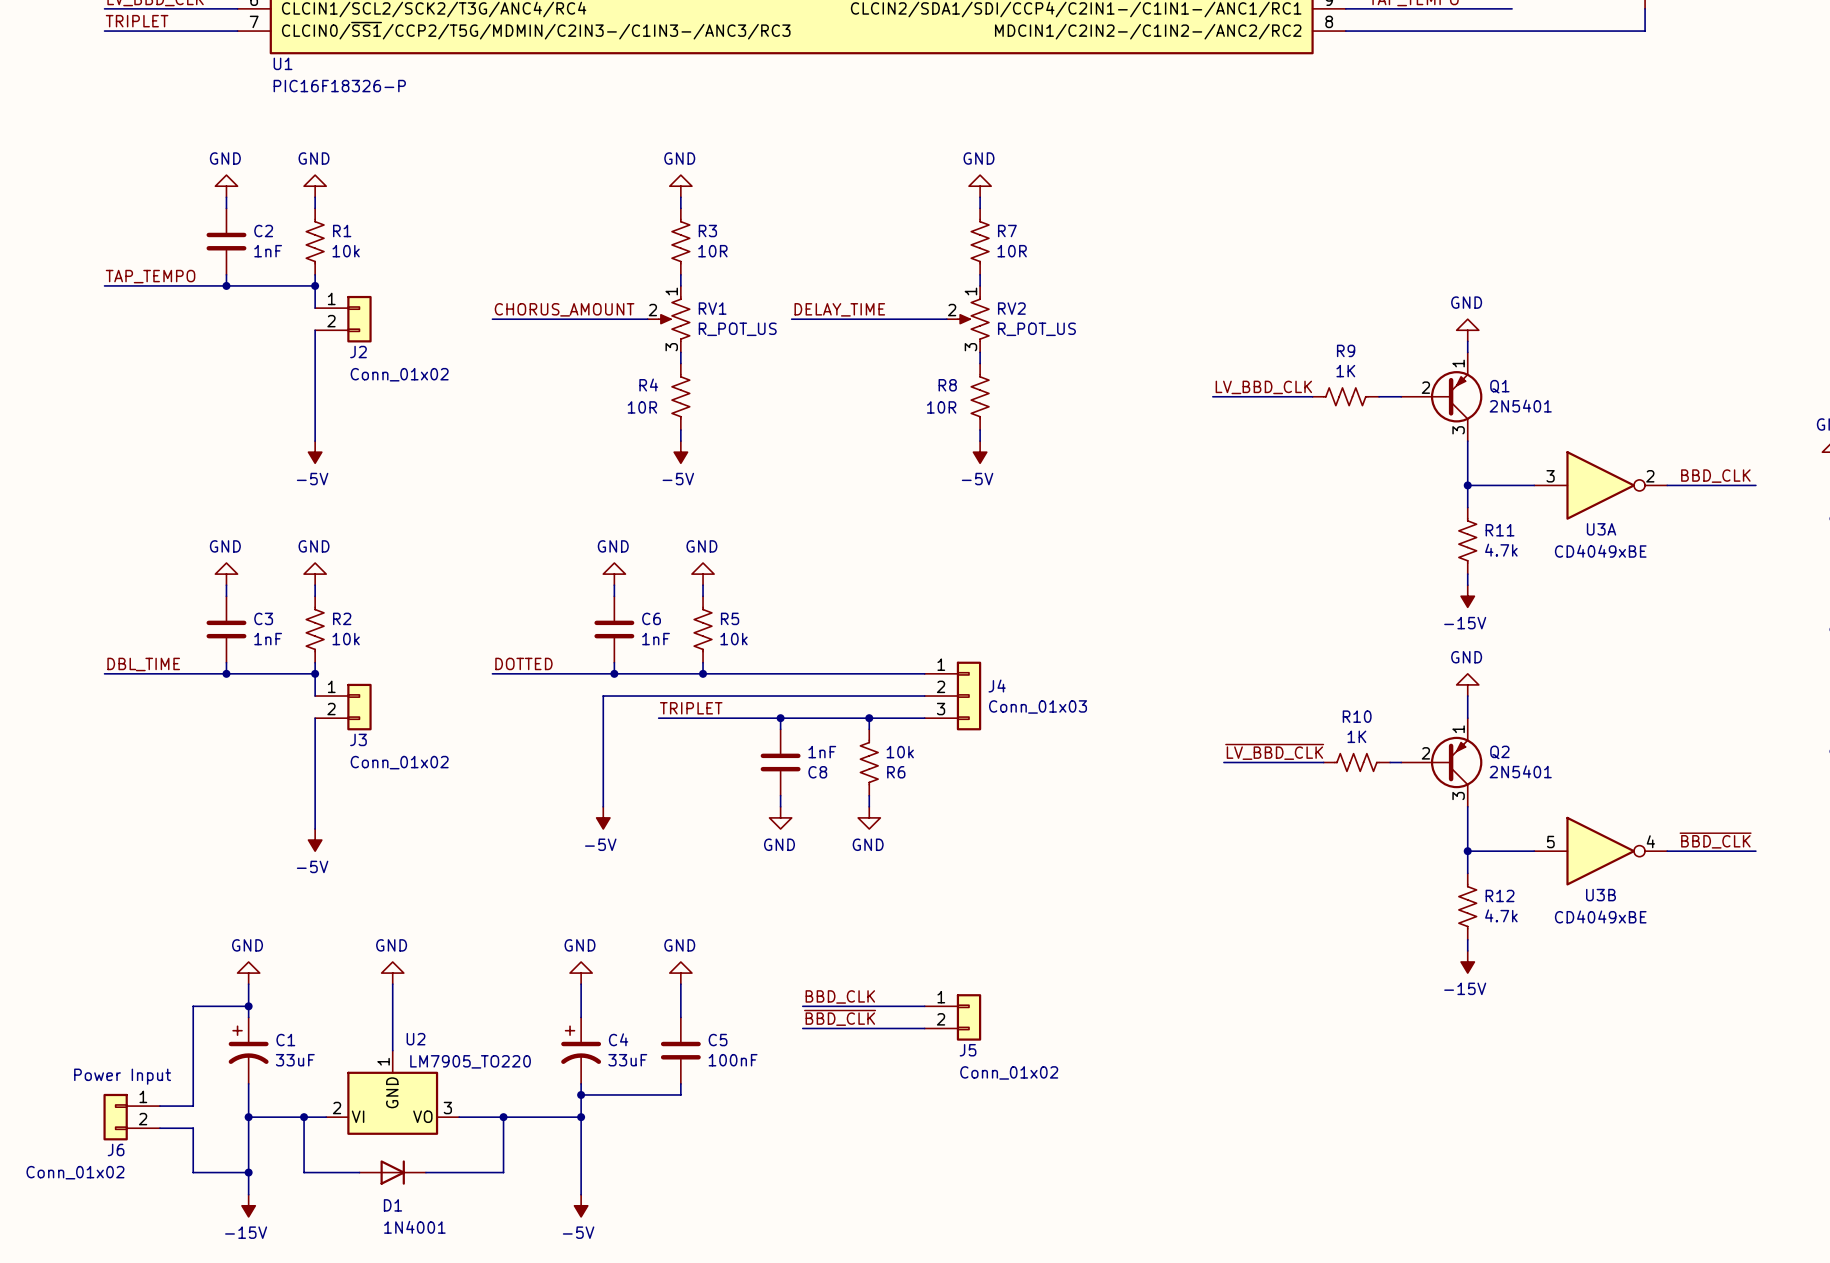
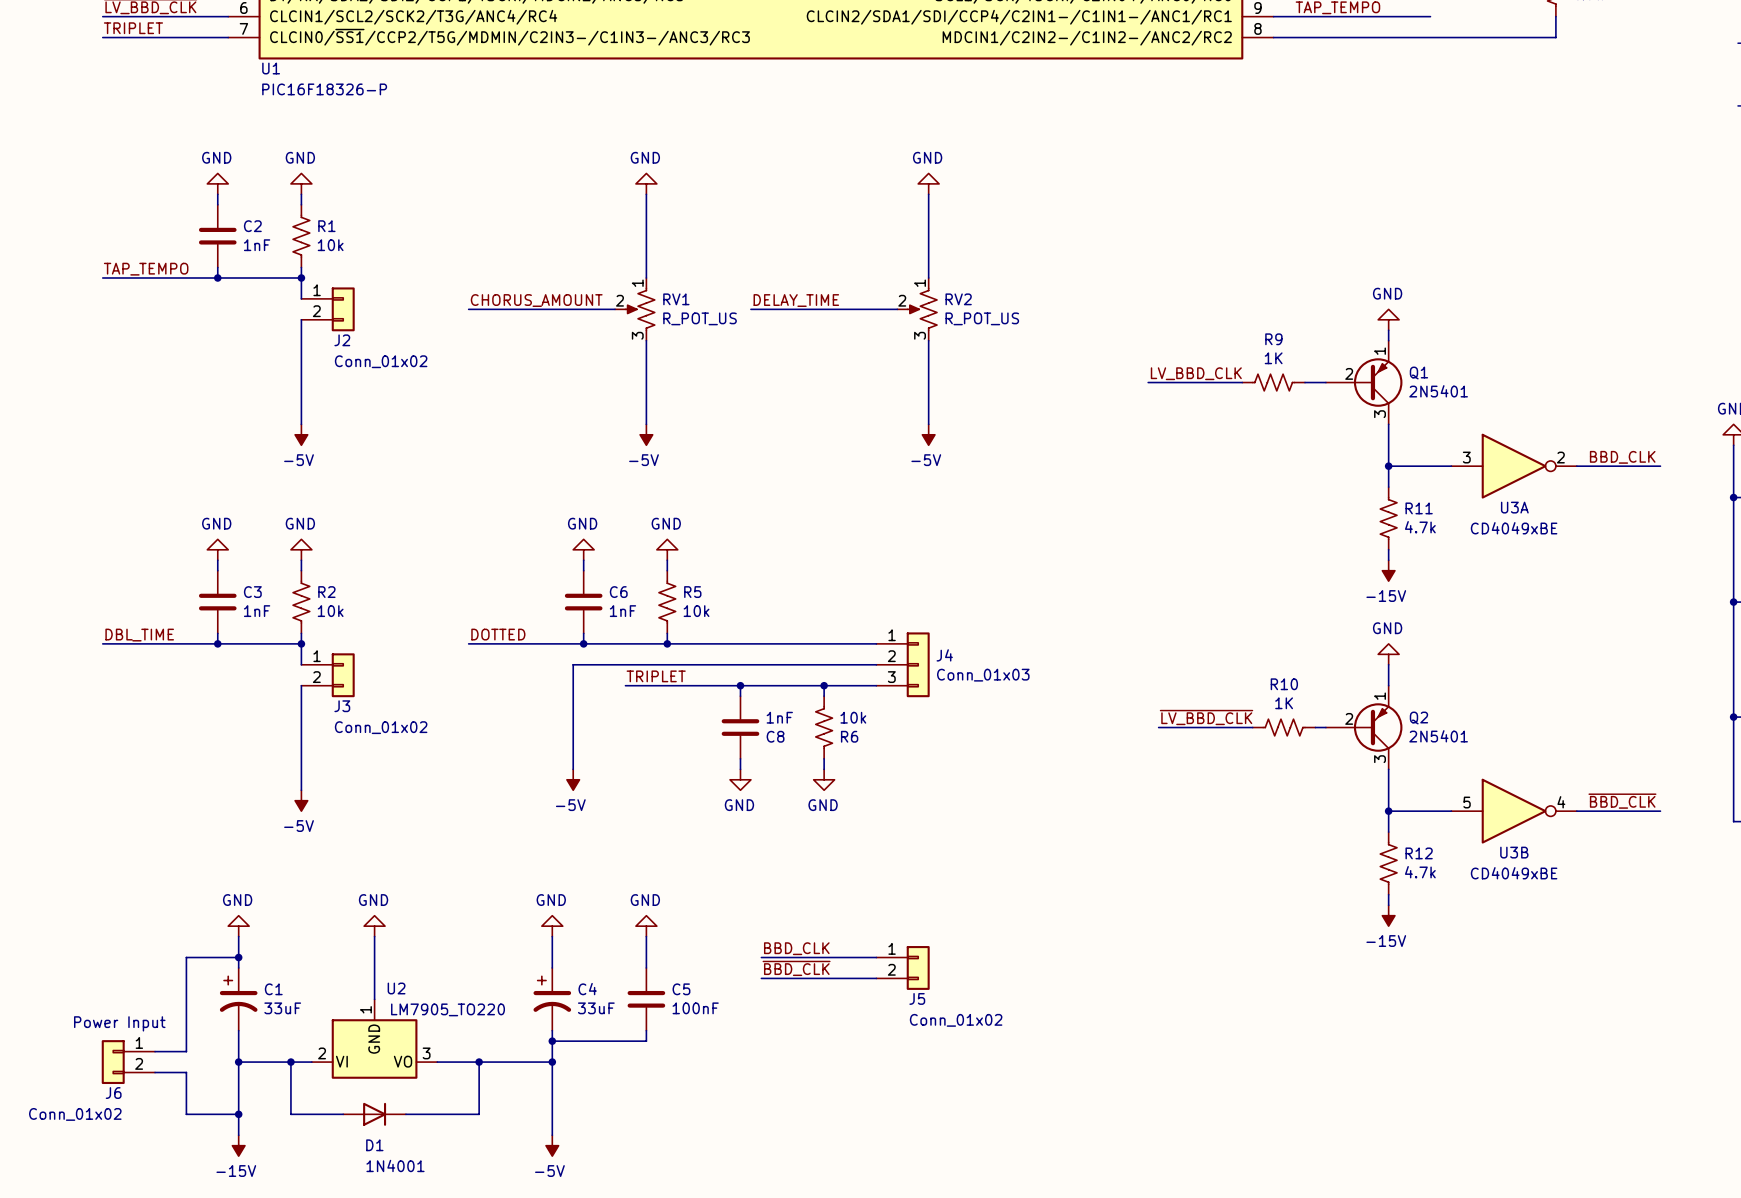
R3: 10R (680, 241) -> none
R7: 10R (980, 241) -> none
R4: 10R (680, 396) -> none
R8: 10R (980, 396) -> none

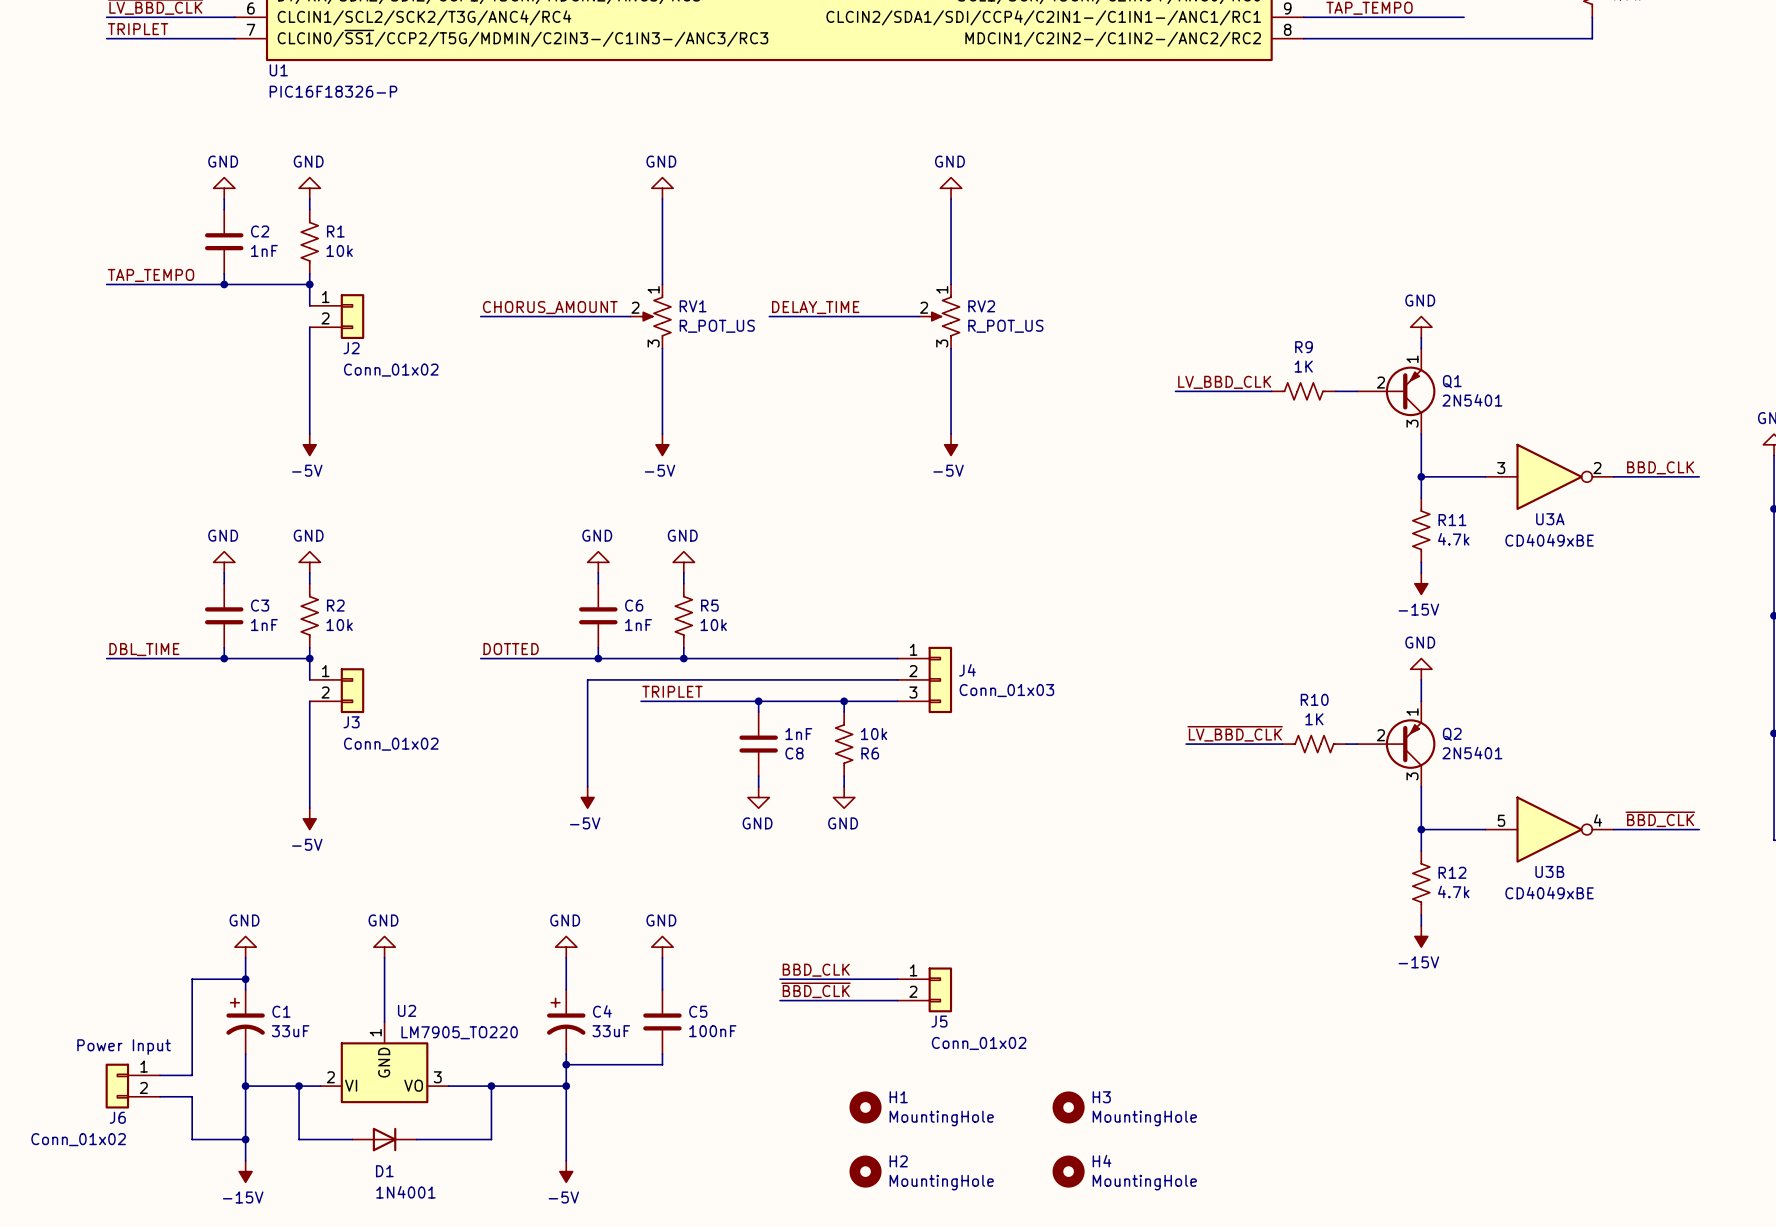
H1: none -> MountingHole (865, 1107)
H3: none -> MountingHole (1068, 1107)
H2: none -> MountingHole (865, 1171)
H4: none -> MountingHole (1068, 1171)

